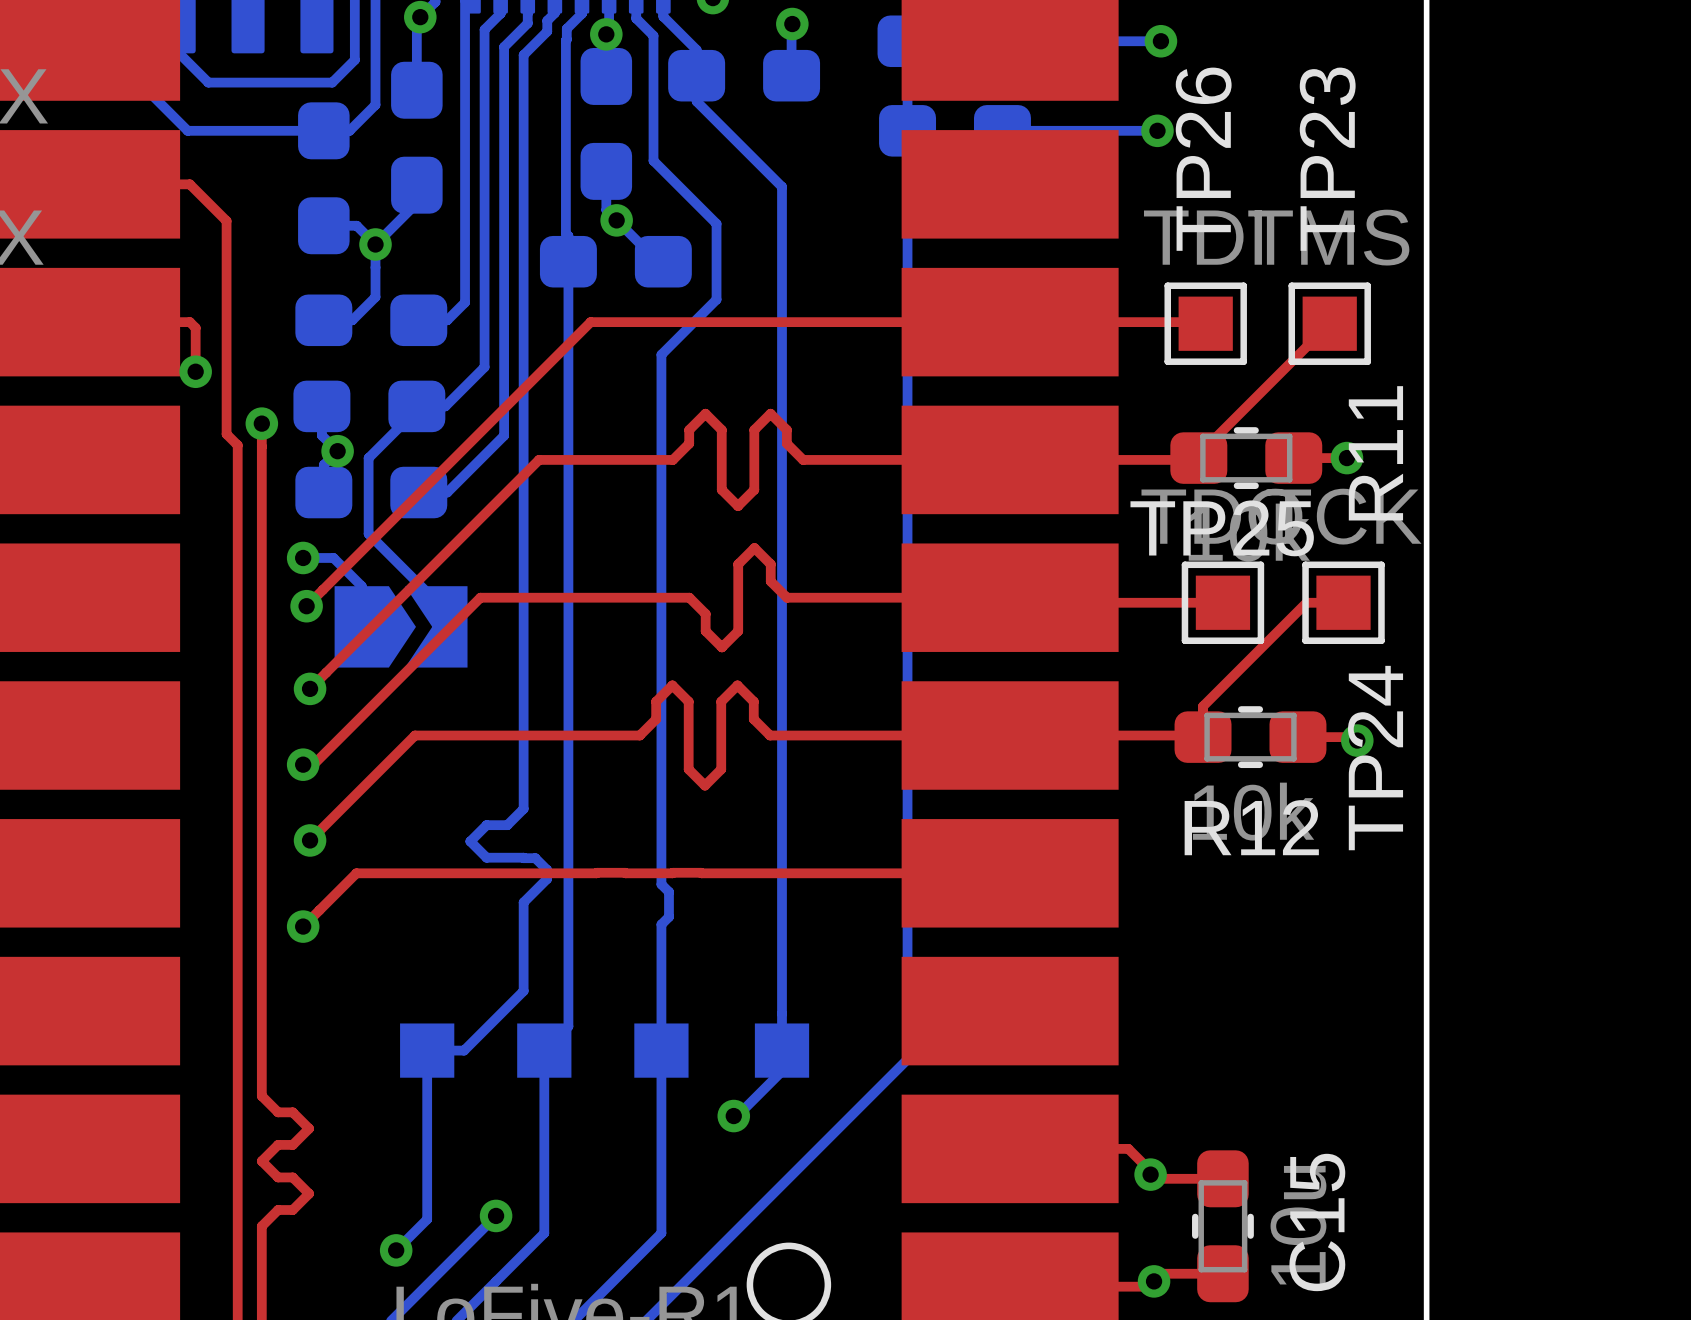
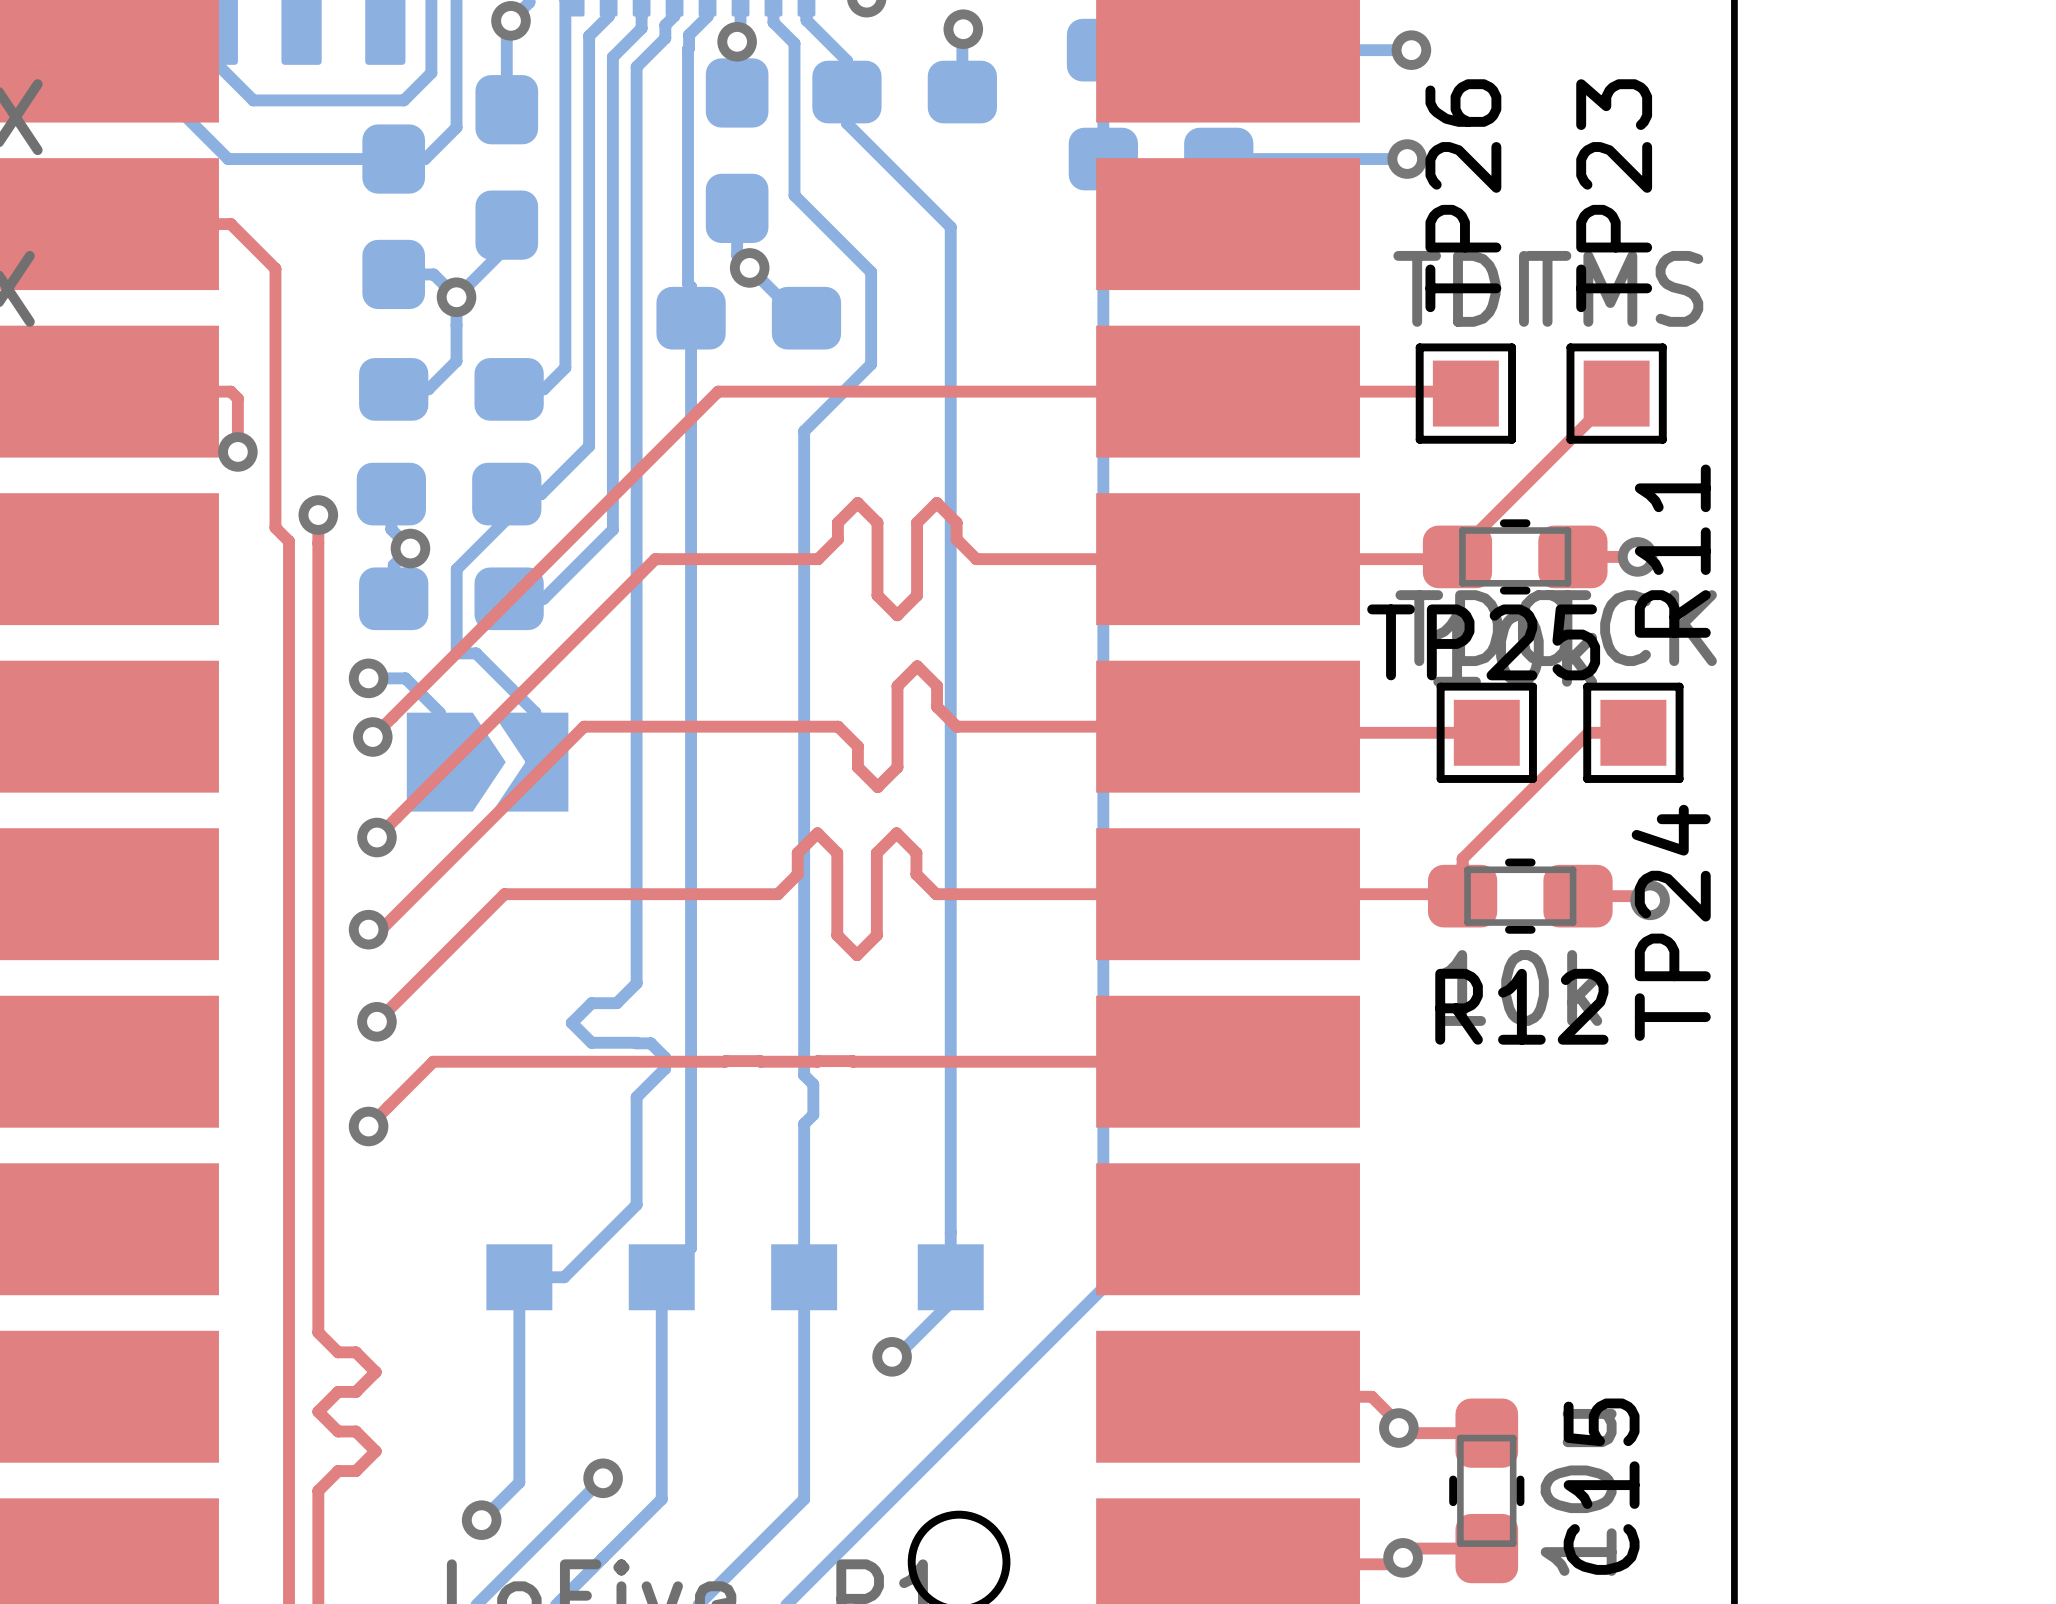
bottom track: (416, 409) (368, 458) (368, 533) (440, 605) -> (506, 498) (506, 519) (456, 569) (456, 653) (476, 653) (535, 712) (535, 736)

